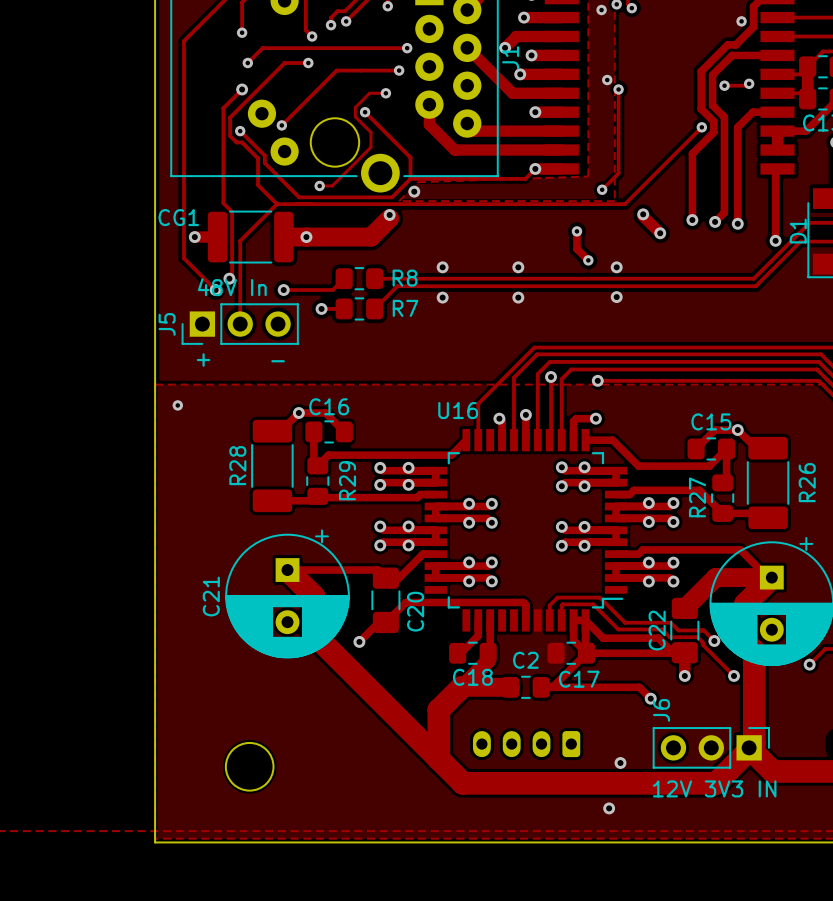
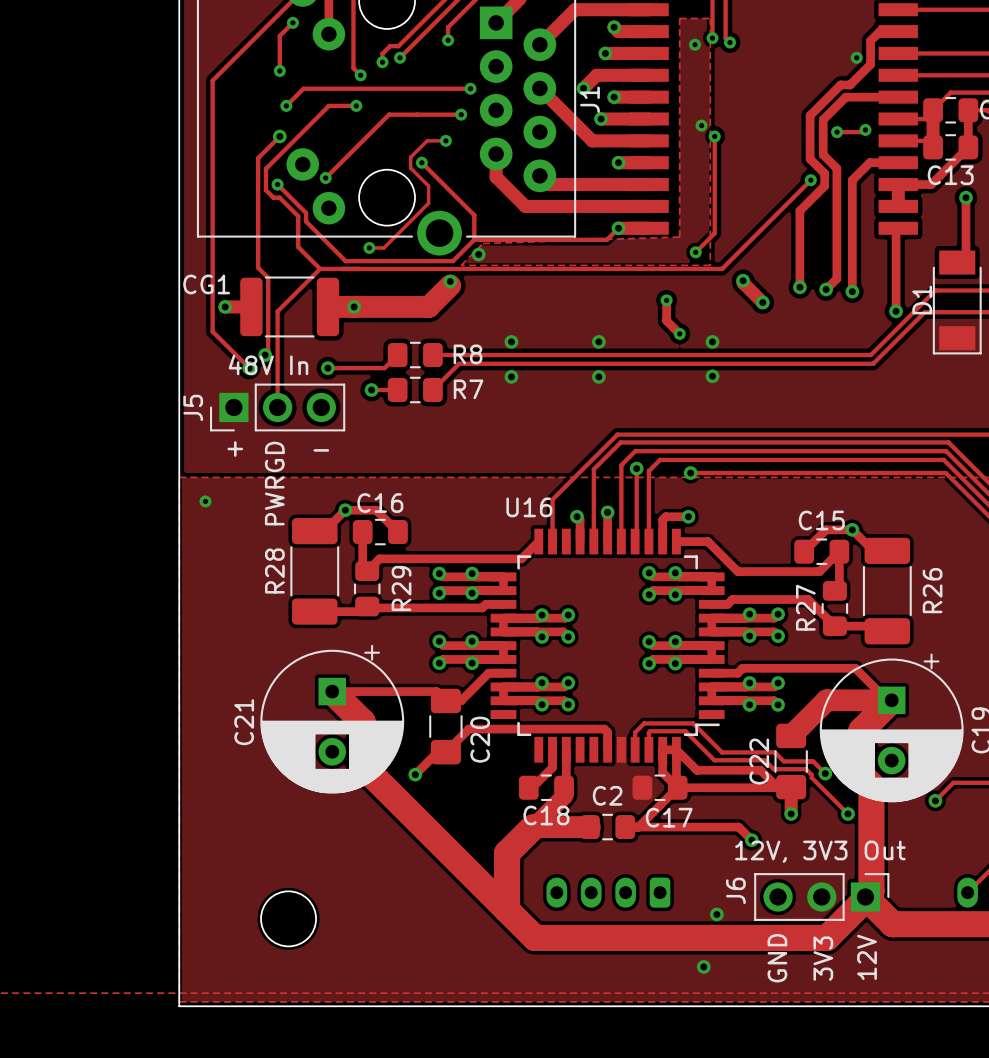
J5 text: none -> PWRGD (274, 483)
J6 name position: J6 (661, 710) -> J6 (735, 890)
J6 value: 12V 3V3 IN (714, 788) -> 12V, 3V3 Out (820, 851)
J6 text: none -> GND (777, 958)
J6 text: none -> 12V (867, 957)
J6 text: none -> 3V3 (823, 958)

